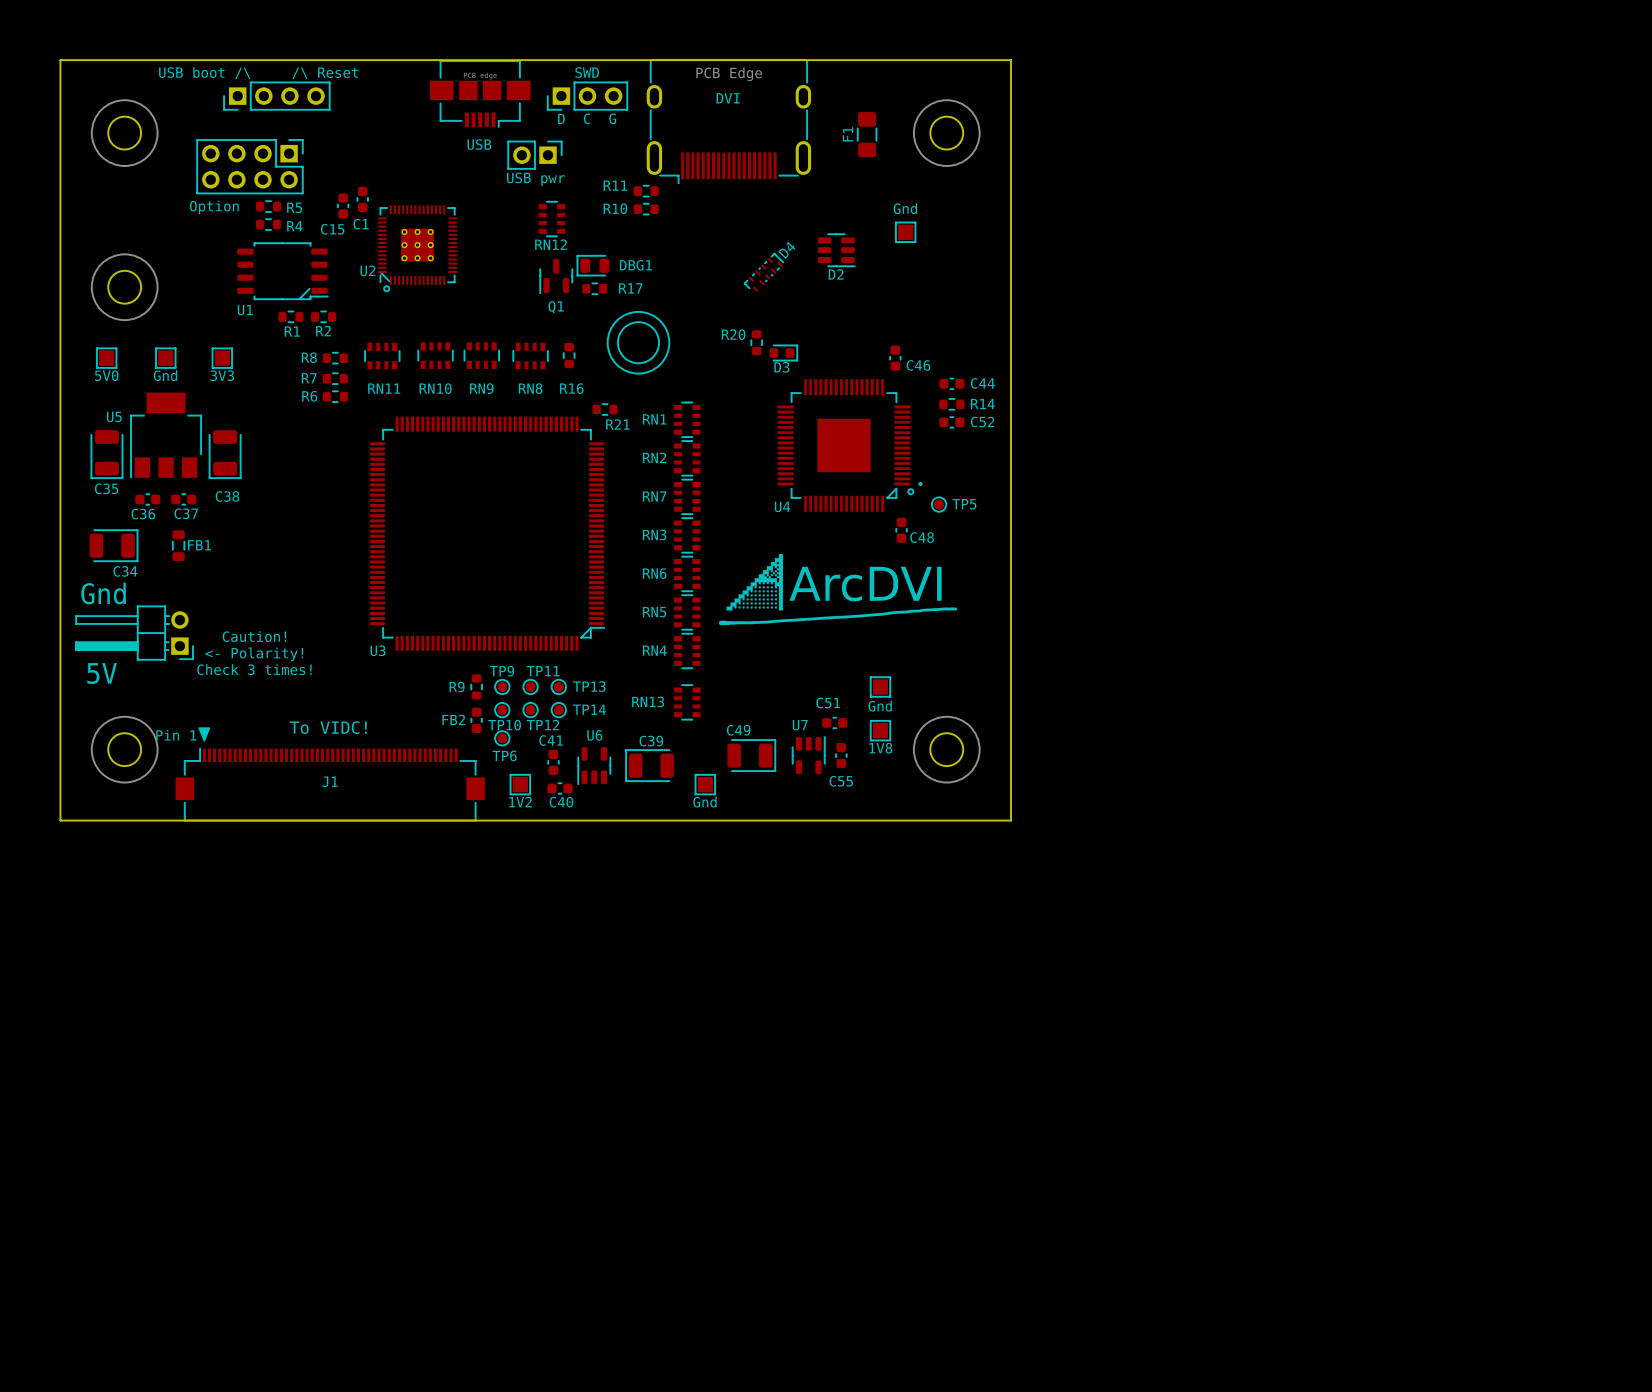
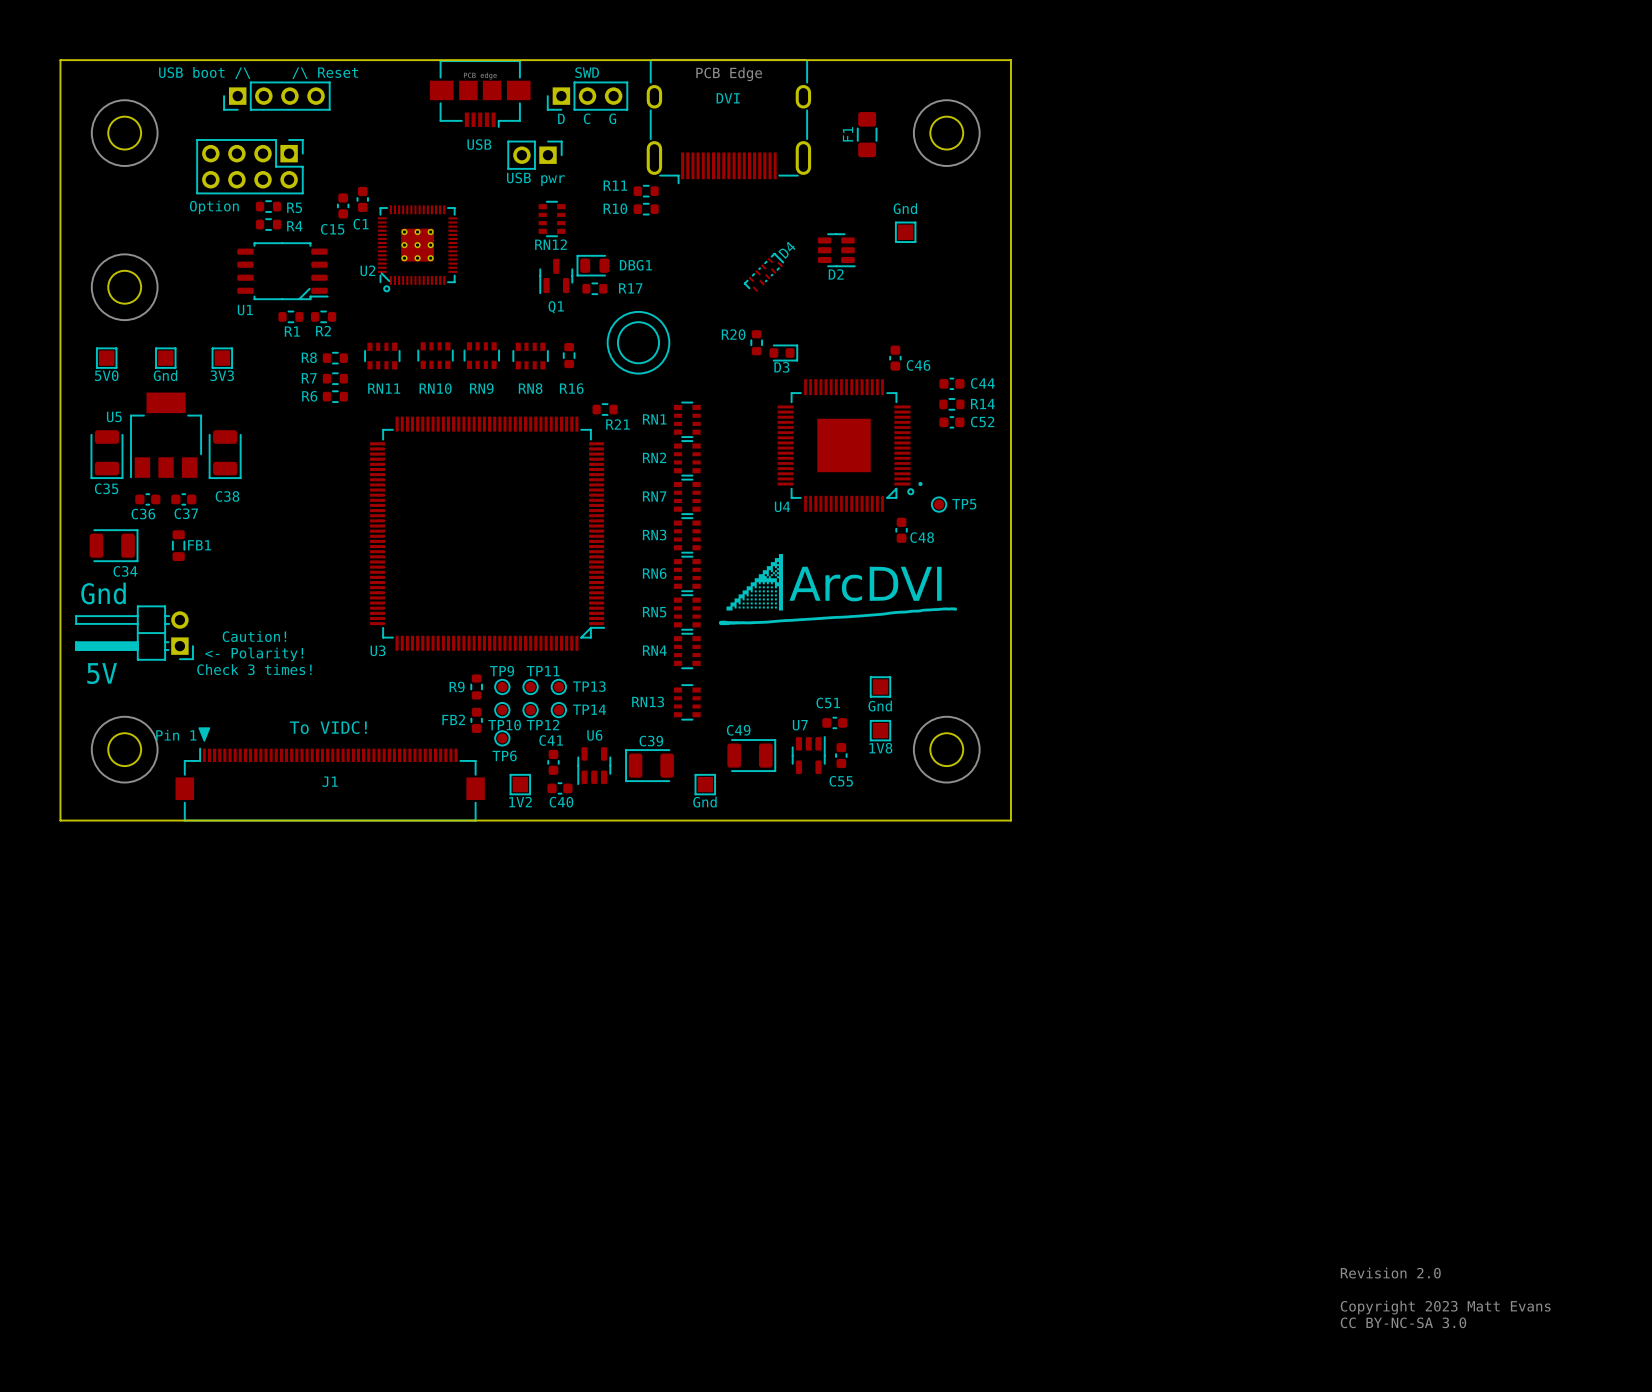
text: none -> Revision 2.0 (1390, 1273)
text: none -> Copyright 2023 Matt Evans (1445, 1307)
text: none -> CC BY-NC-SA 3.0 (1403, 1322)

